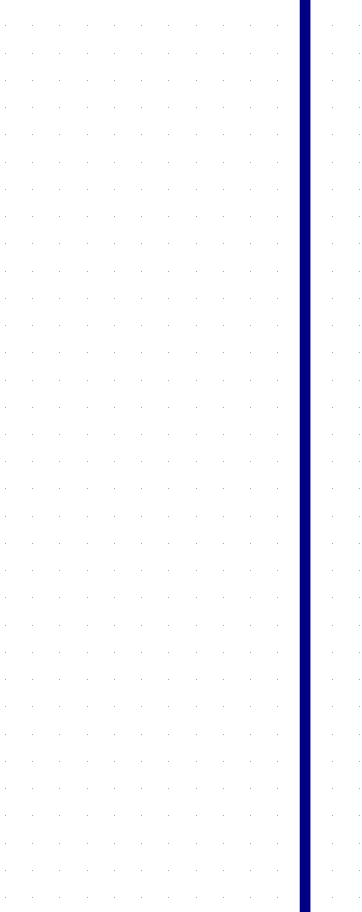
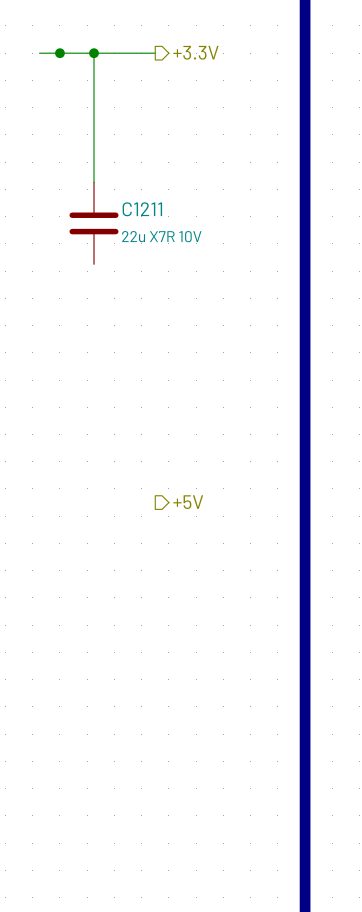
hierarchical label: none -> +3.3V (195, 52)
wire: none -> (39, 53) (155, 53)
junction: none -> (59, 53)
wire: none -> (94, 53) (94, 182)
junction: none -> (94, 53)
C1211: none -> 22u X7R 10V (94, 223)
hierarchical label: none -> +5V (188, 502)

